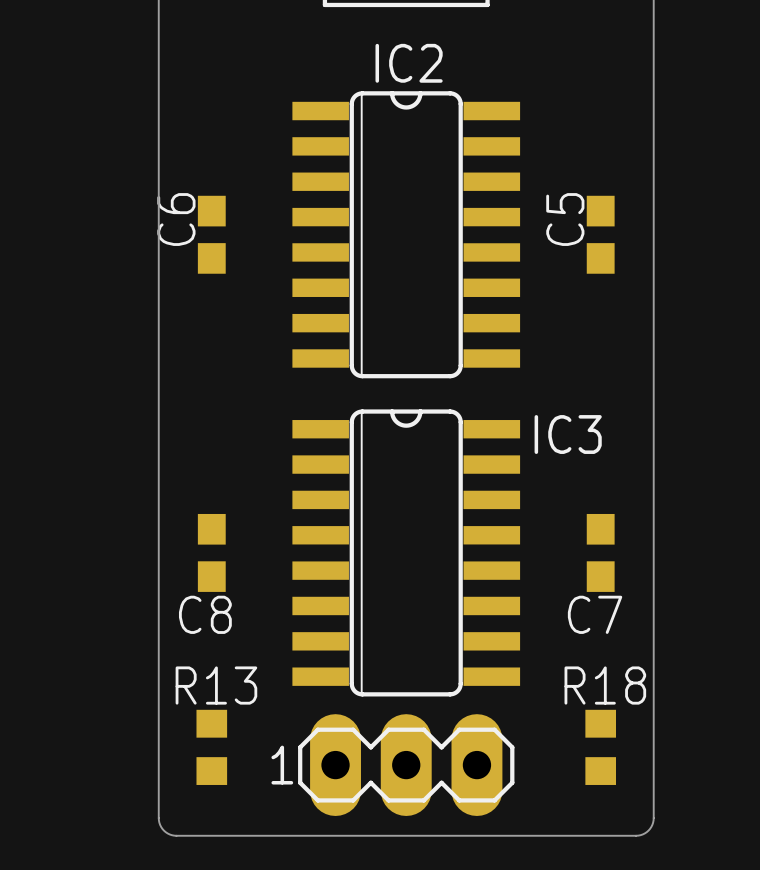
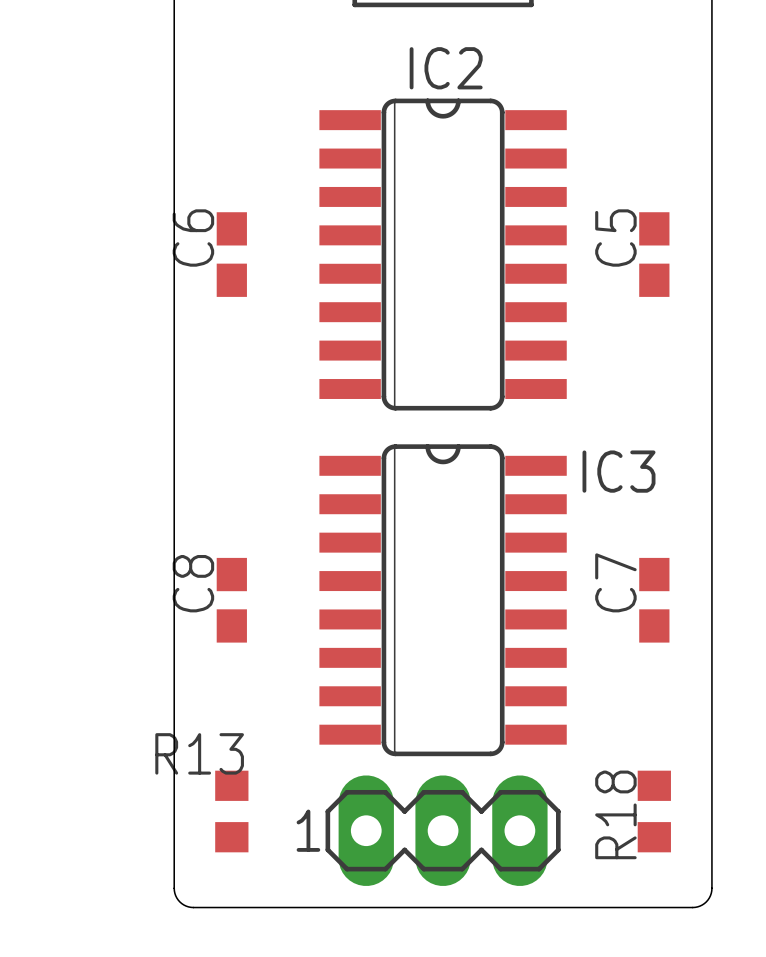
C8 name rotation: 0° (205, 614) -> 90° counterclockwise (193, 583)
C8 name position: C8 (205, 614) -> C8 (193, 583)
C7 name rotation: 0° (595, 614) -> 90° counterclockwise (615, 582)
C7 name position: C7 (595, 614) -> C7 (615, 582)
R13 name position: R13 (216, 685) -> R13 (199, 753)
R18 name rotation: 0° (605, 685) -> 90° counterclockwise (615, 814)

